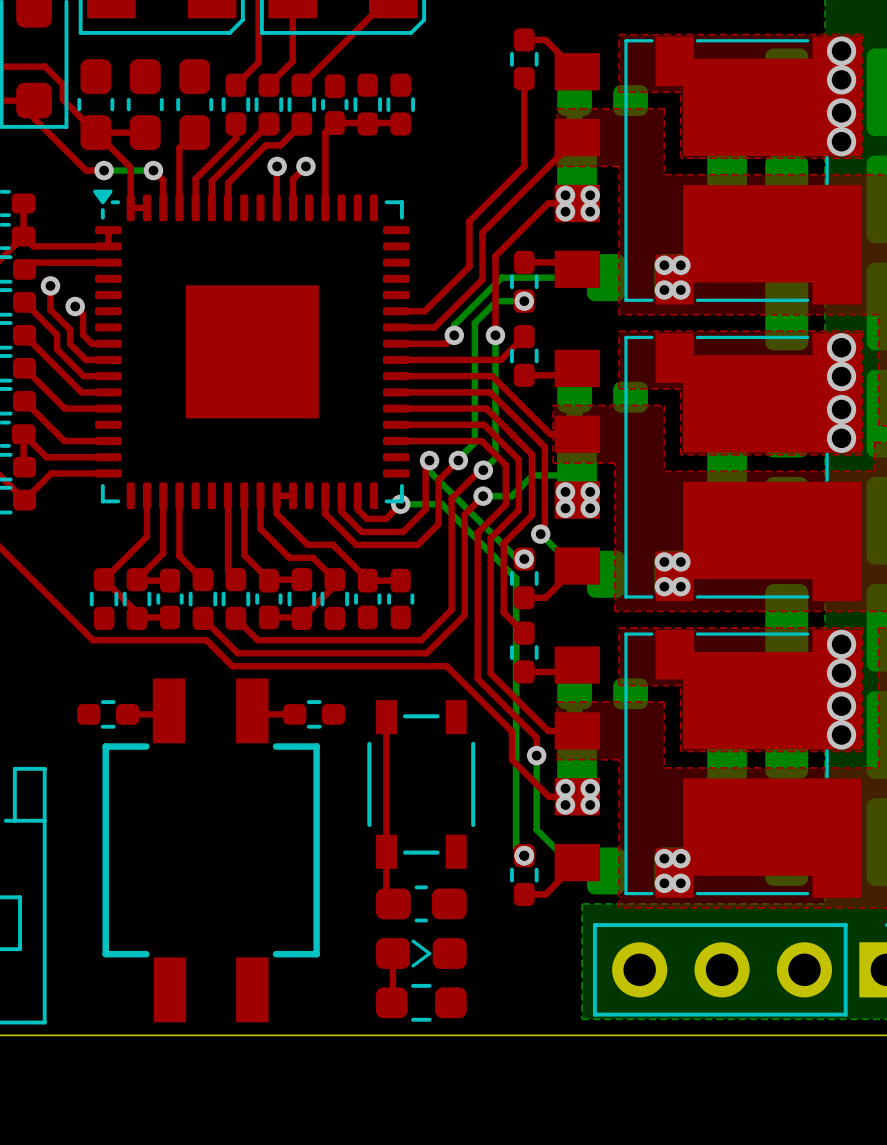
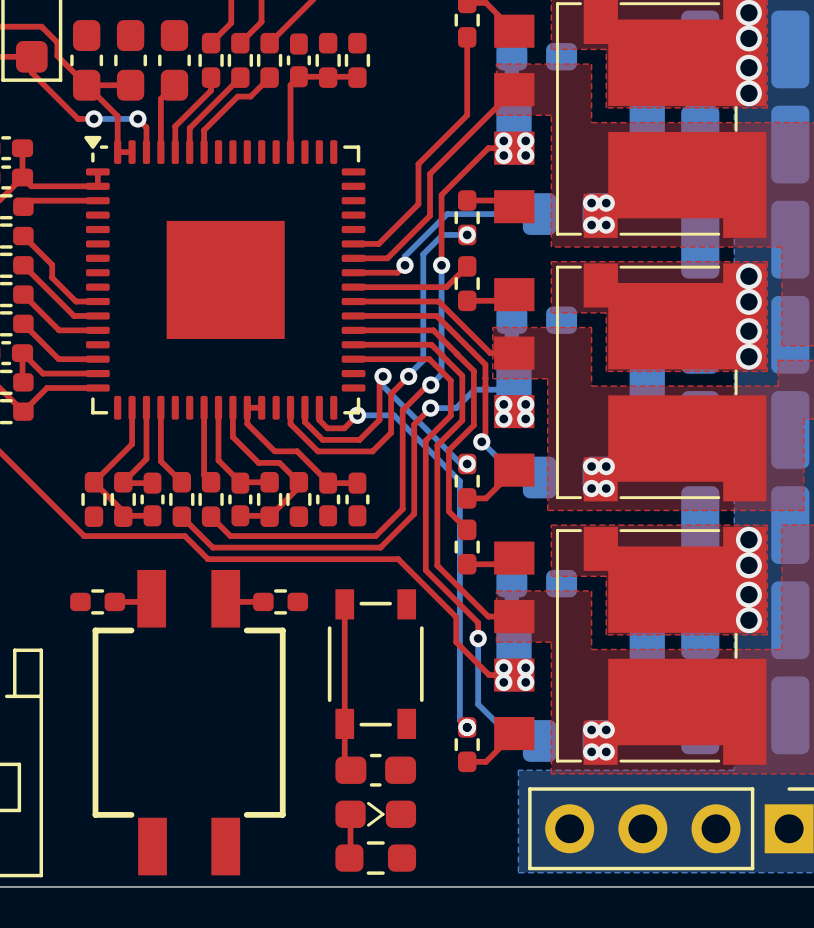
top track: (276, 166) (276, 207) -> none
via: (277, 166) -> none
top track: (305, 166) (292, 179) (292, 207) -> none
via: (305, 166) -> none
top track: (50, 285) (50, 309) (70, 329) (70, 344) (86, 360) (108, 359) -> none
via: (50, 285) -> none
top track: (75, 306) (83, 314) (83, 334) (91, 343) (108, 343) -> none
via: (75, 306) -> none

